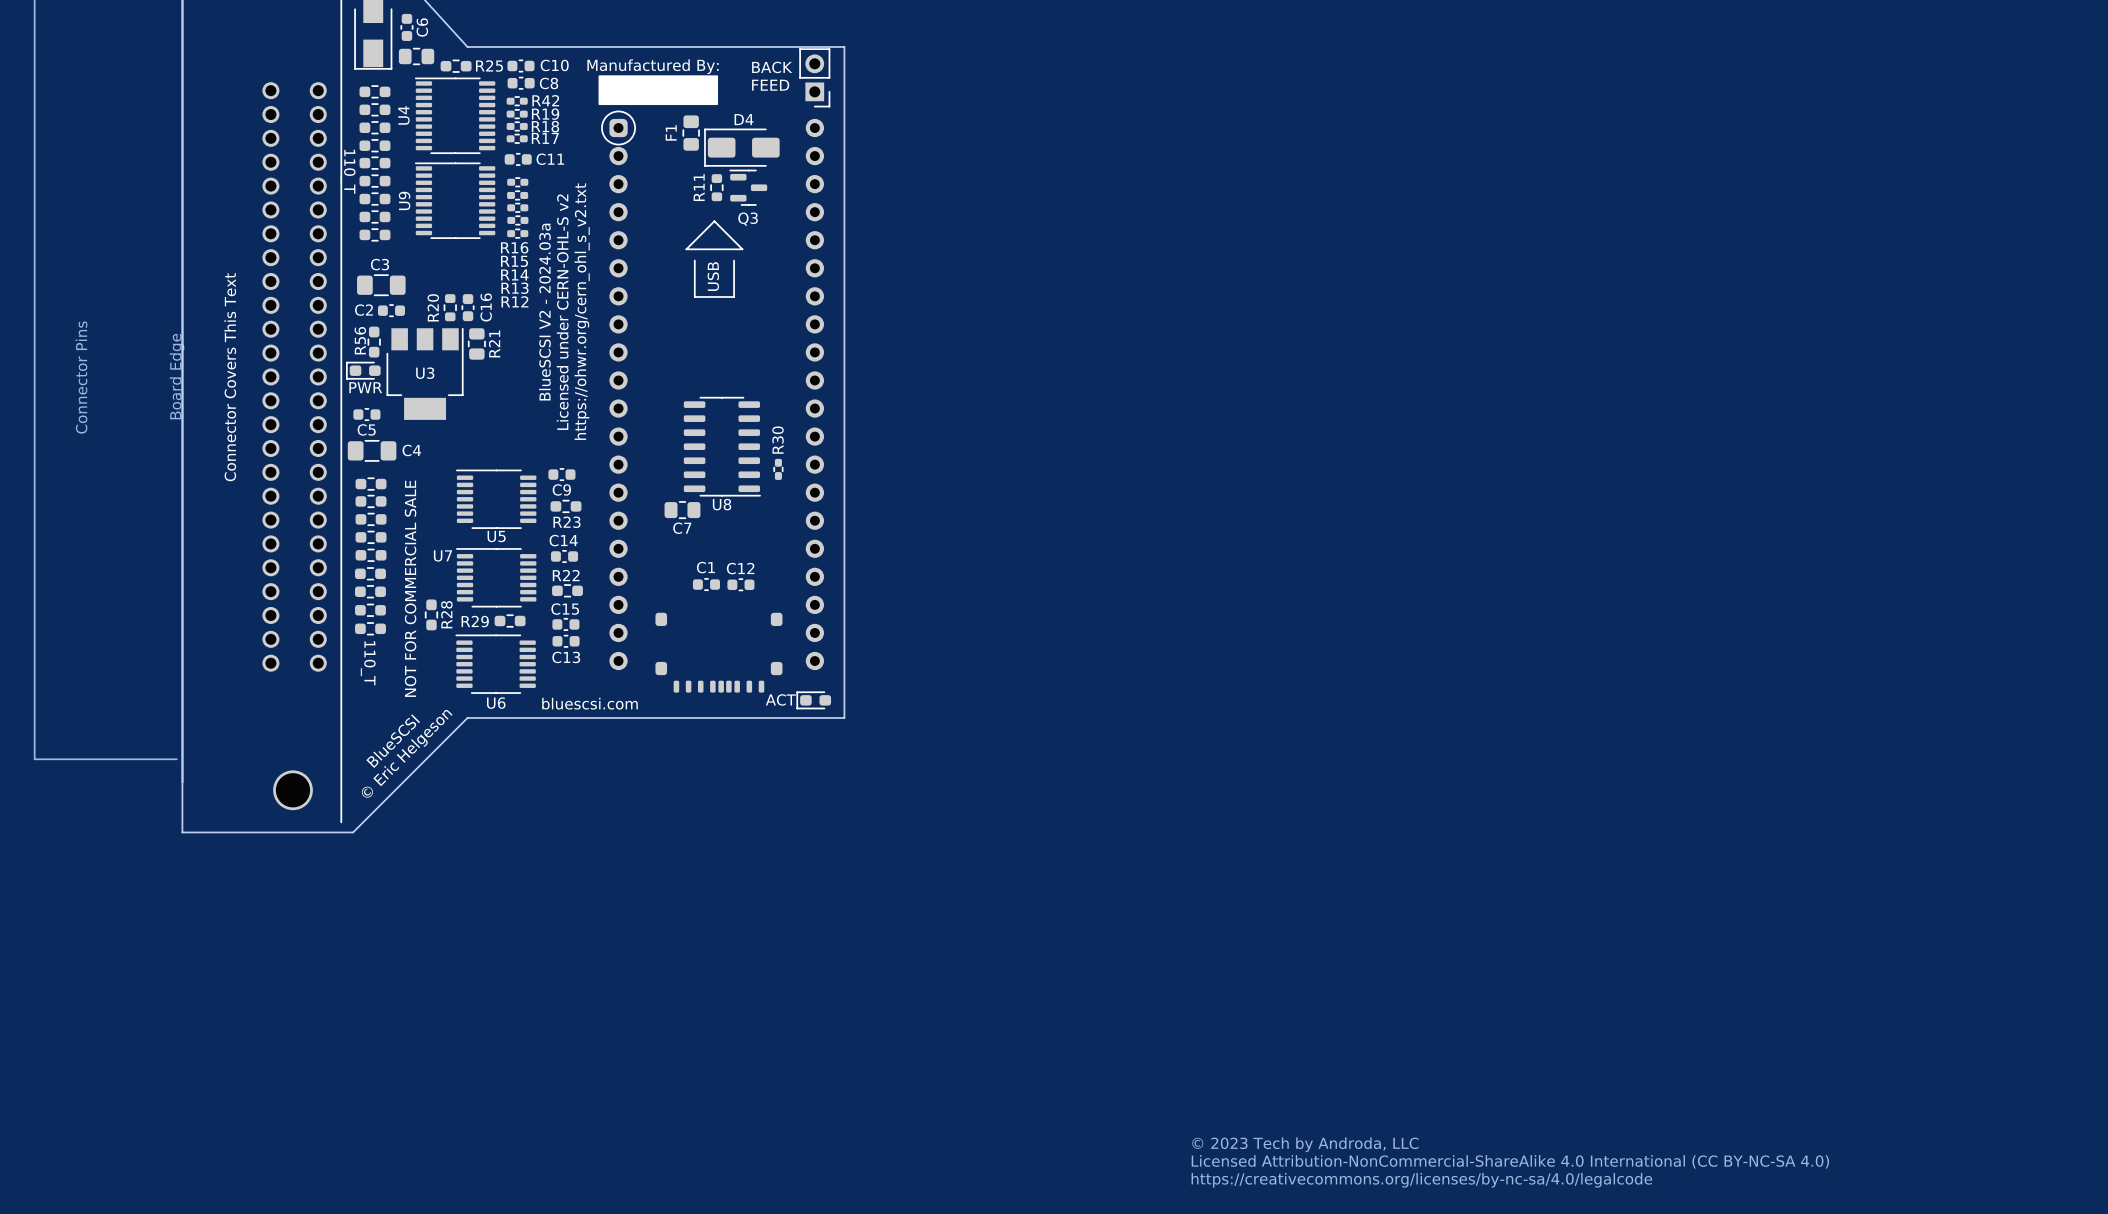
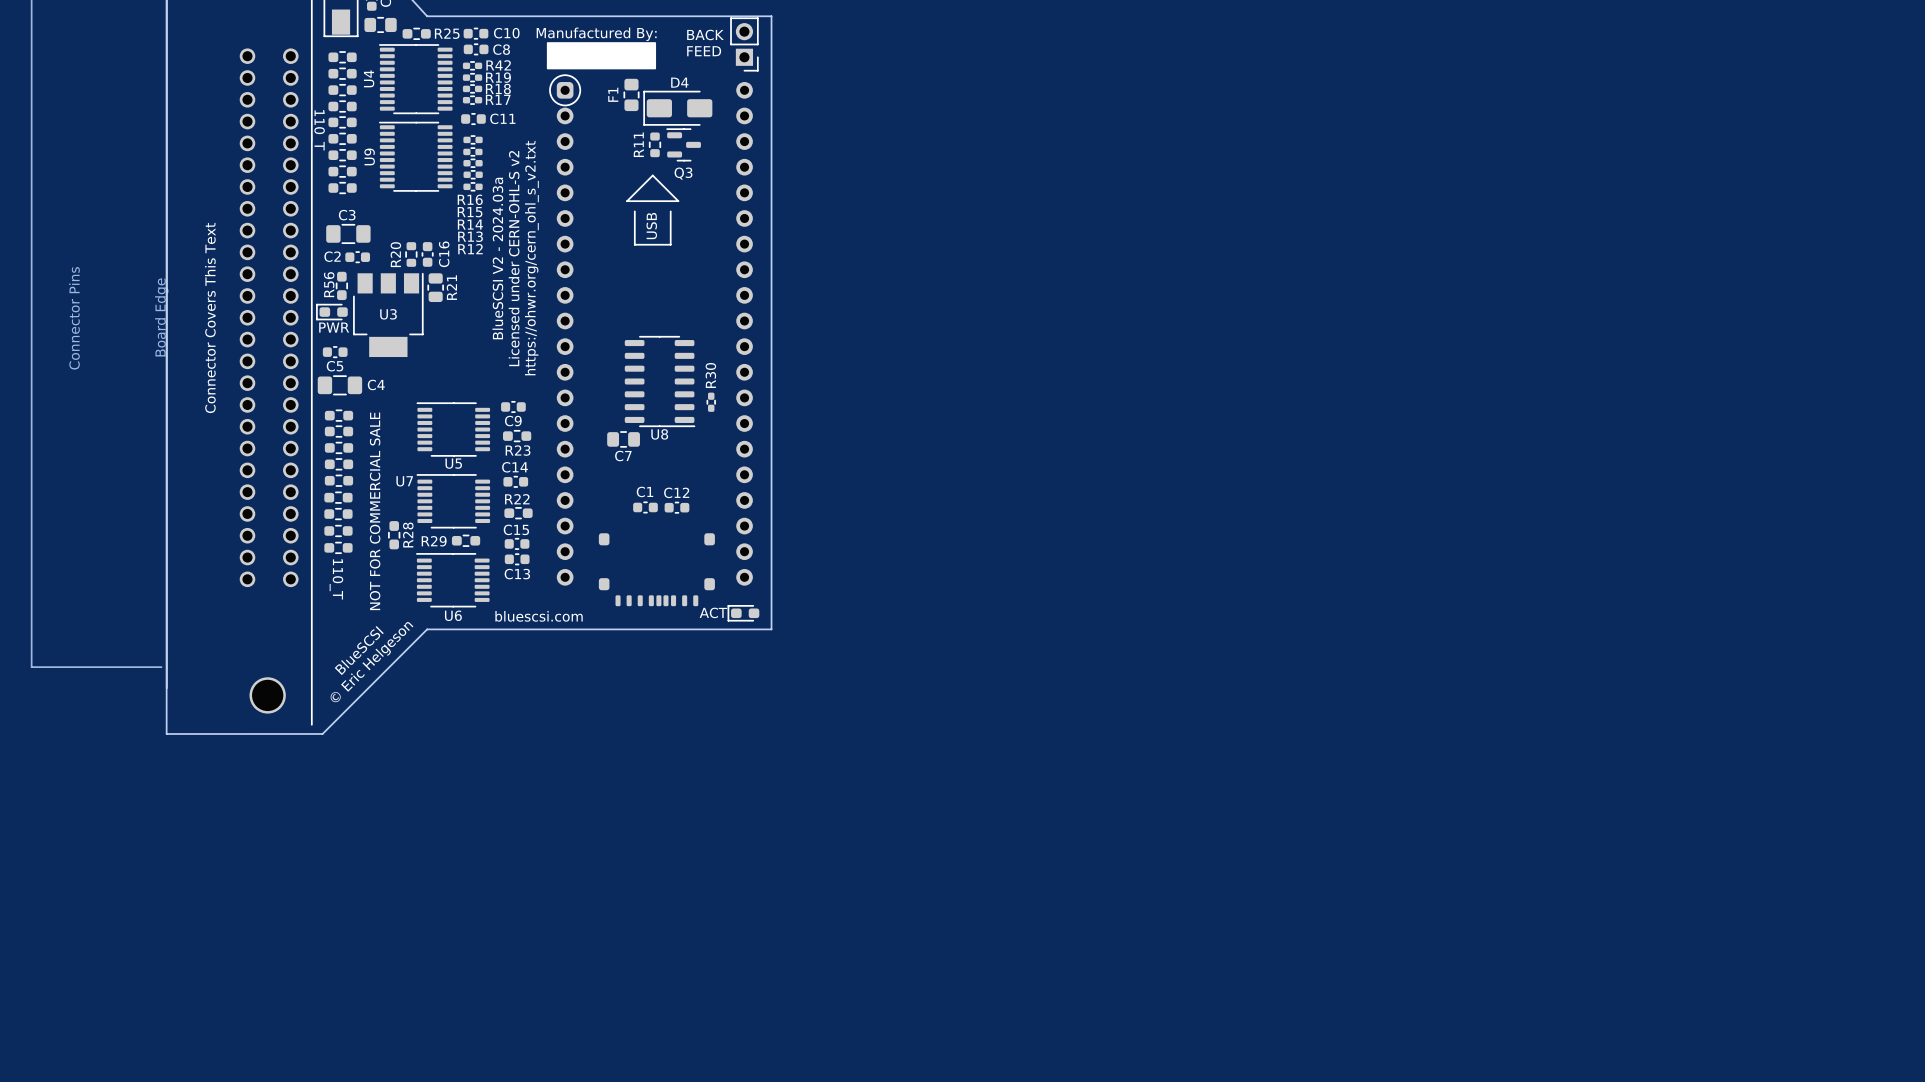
text: © 2023 Tech by Androda, LLC (1305, 1144) -> none
text: Licensed Attribution-NonCommercial-ShareAlike 4.0 International (CC BY-NC-SA 4.0) (1510, 1161) -> none
text: https://creativecommons.org/licenses/by-nc-sa/4.0/legalcode (1421, 1180) -> none

